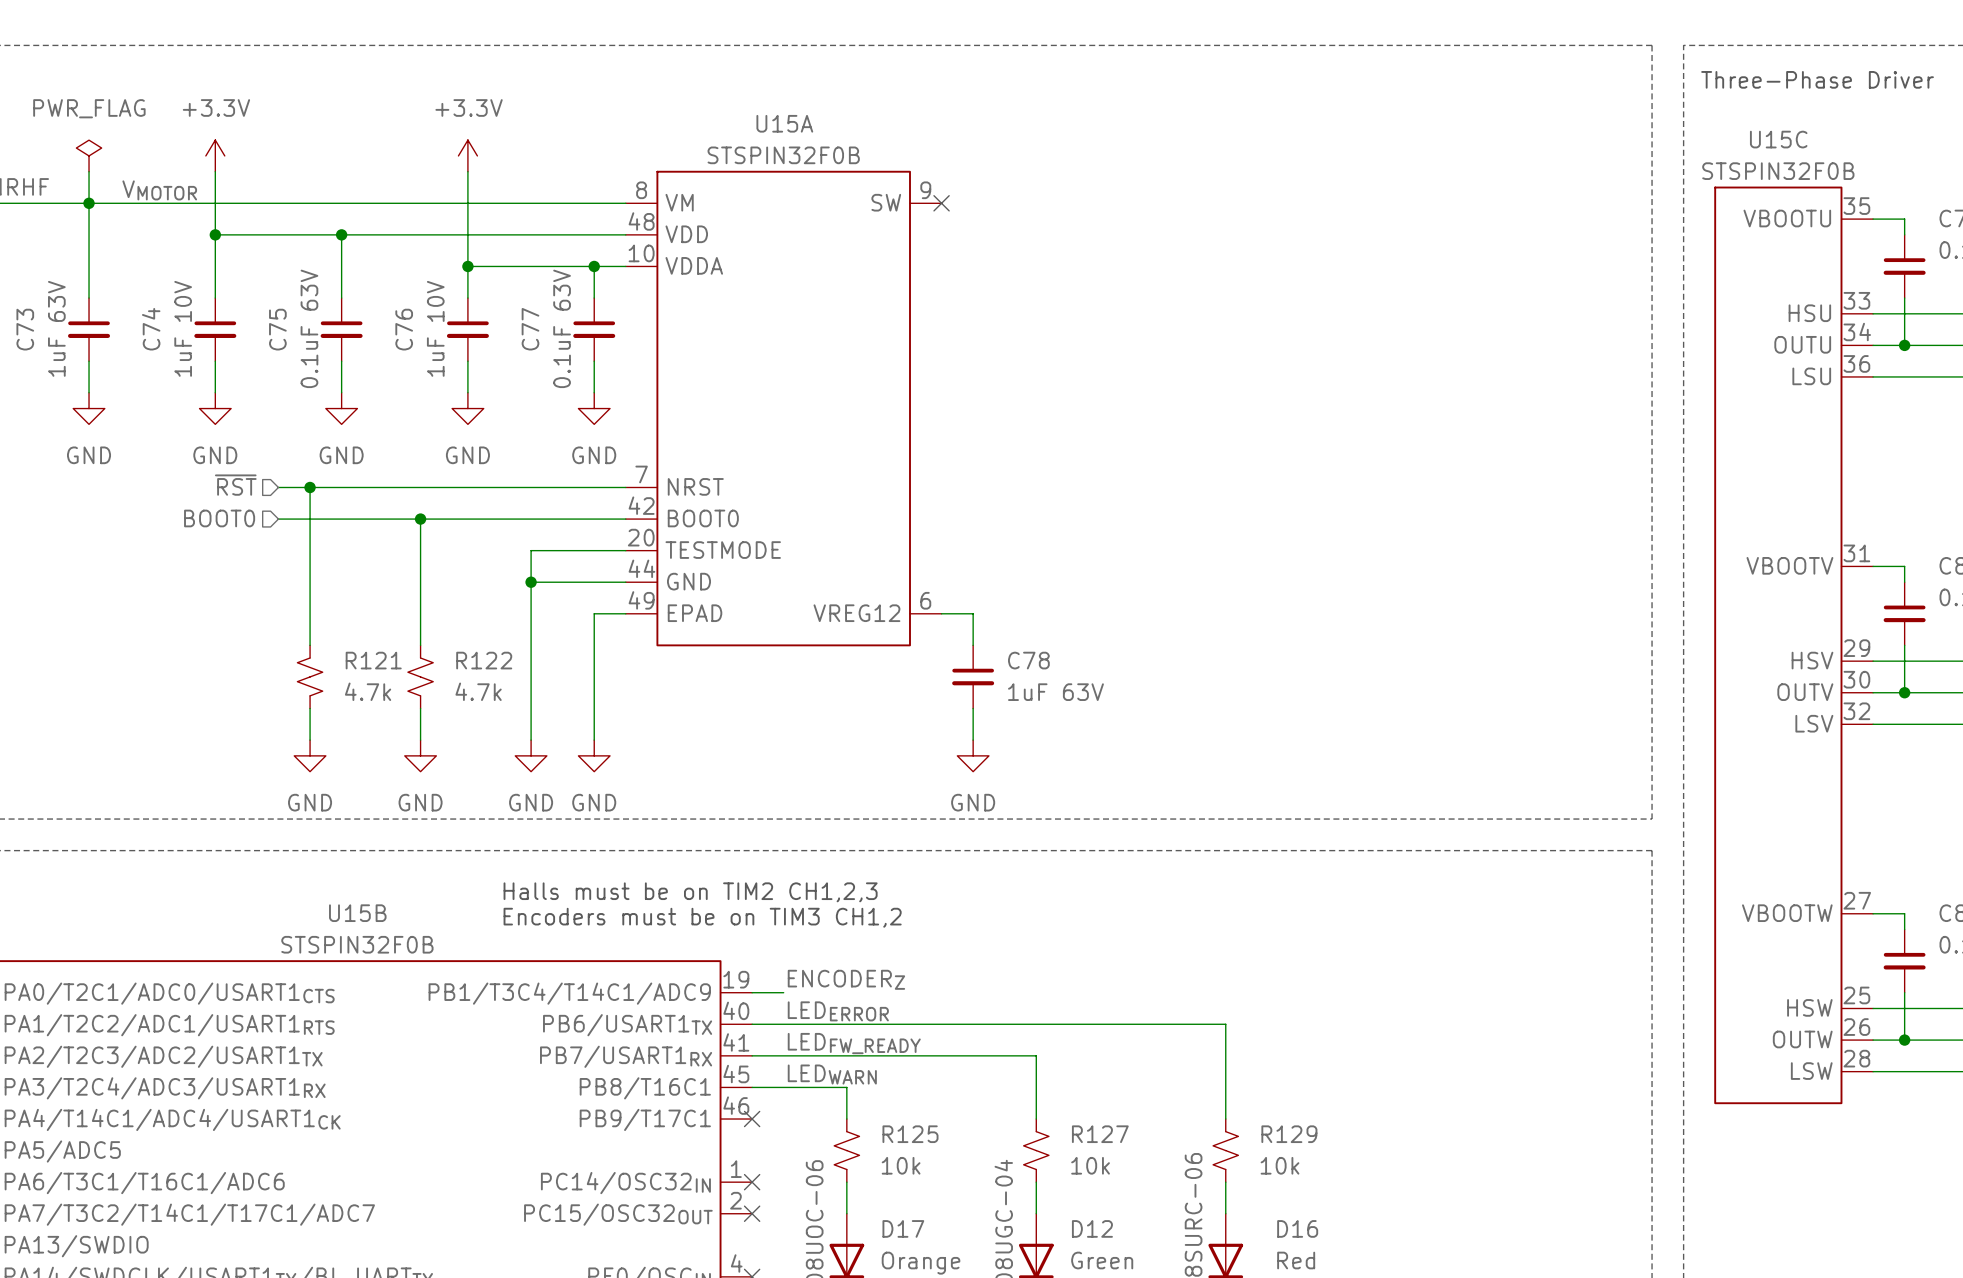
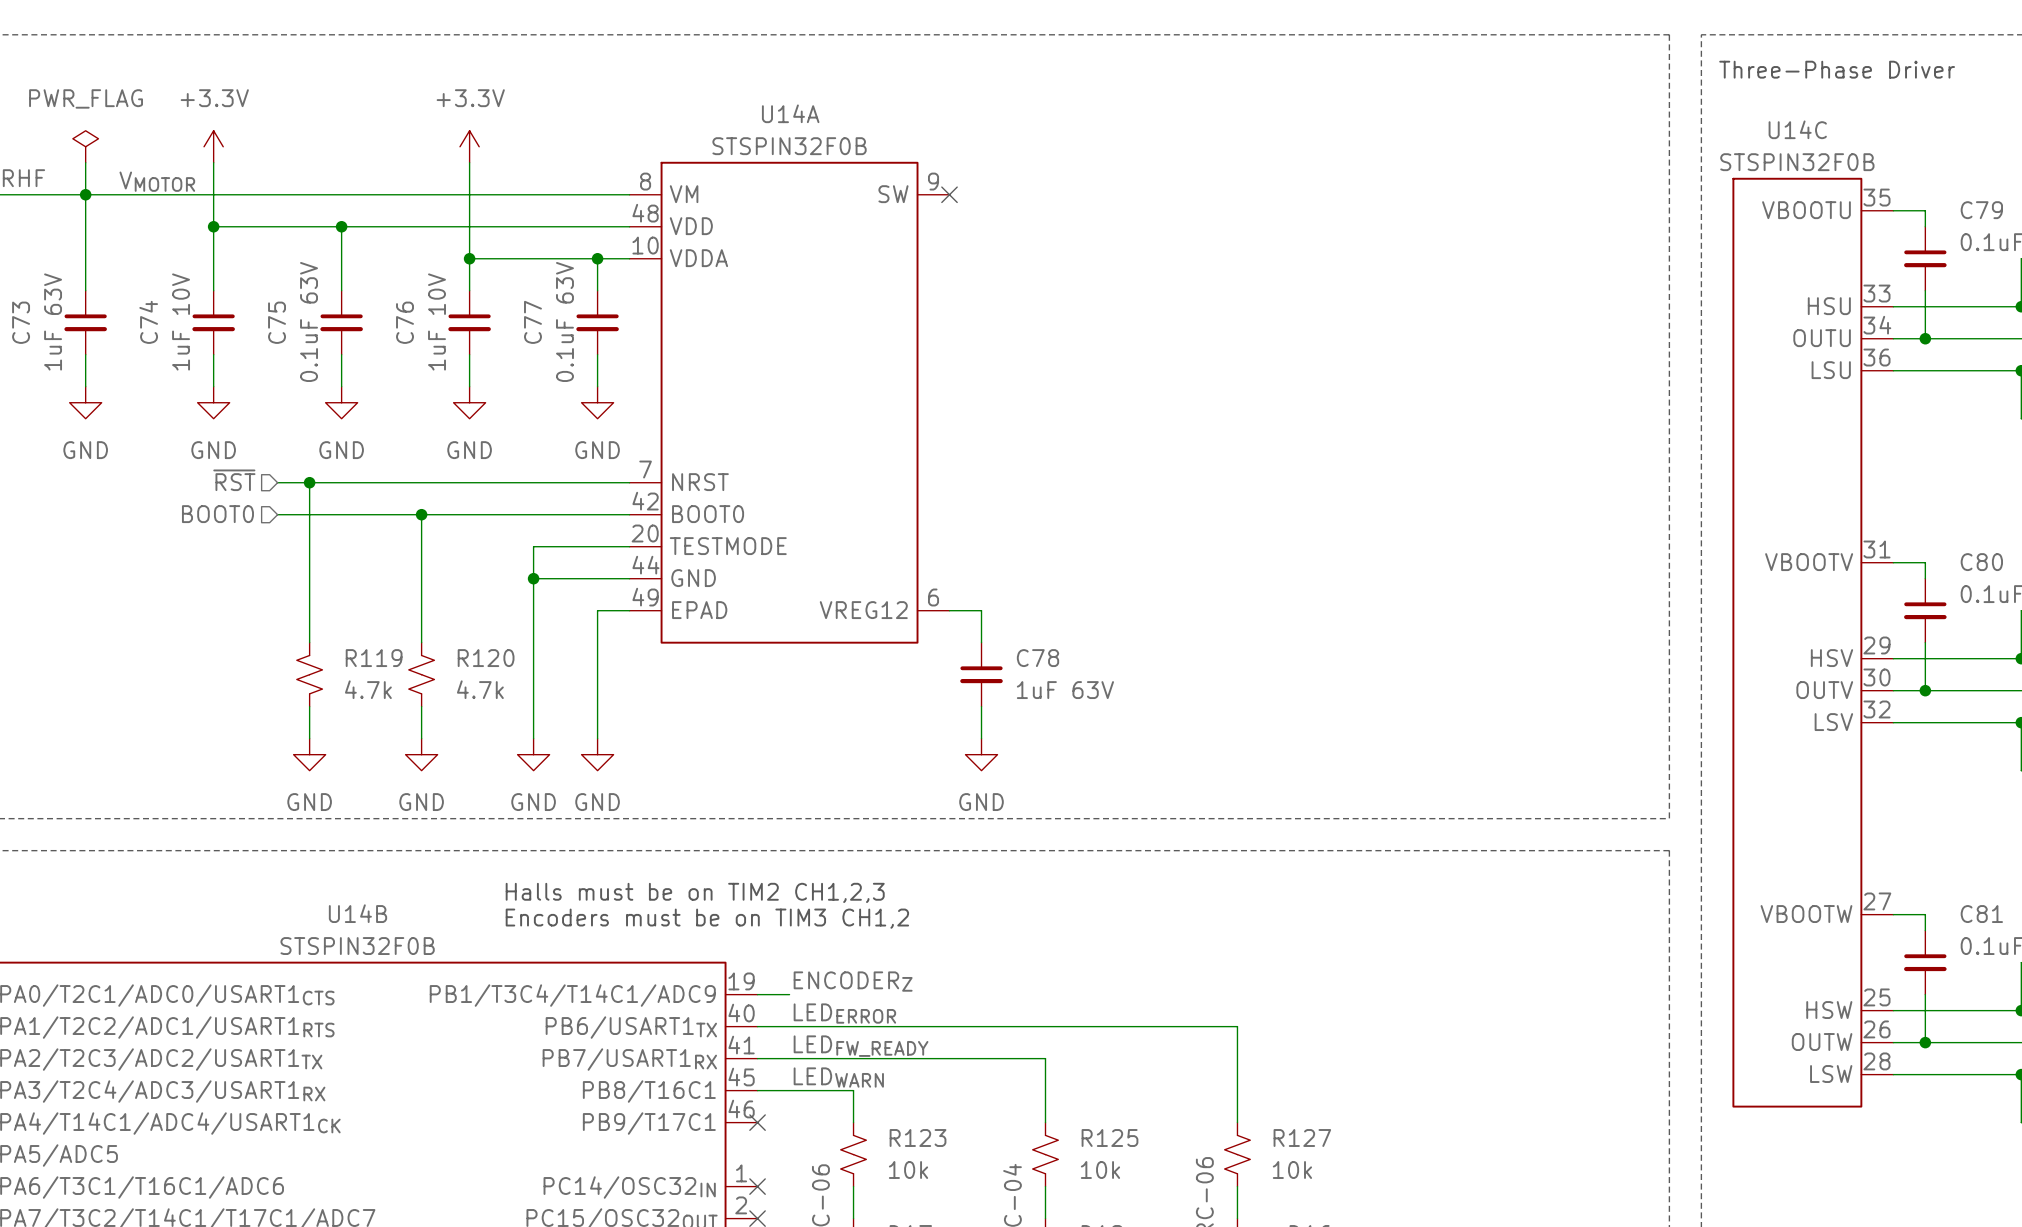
U15A name: U15A (784, 123) -> U14A (790, 113)
U15C name: U15C (1778, 139) -> U14C (1797, 129)
R121 name: R121 (373, 660) -> R119 (374, 658)
R122 name: R122 (484, 660) -> R120 (486, 658)
U15B name: U15B (357, 913) -> U14B (357, 913)
R125 name: R125 (910, 1134) -> R123 (918, 1138)
R127 name: R127 (1100, 1134) -> R125 (1109, 1138)
R129 name: R129 (1289, 1134) -> R127 (1302, 1138)

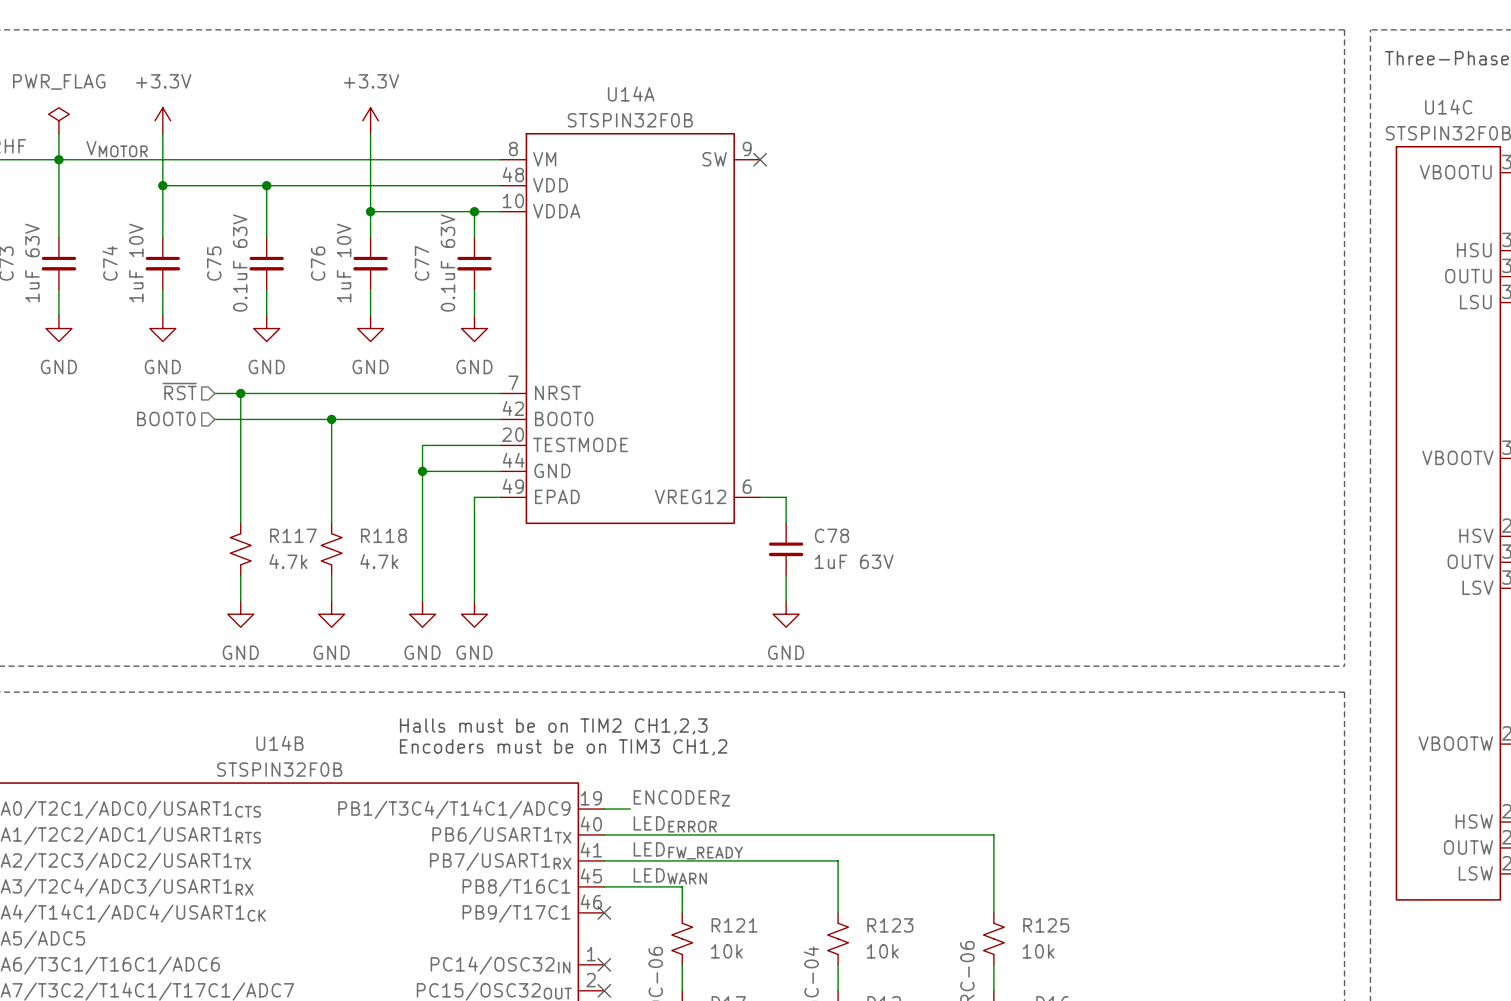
R119 name: R119 (374, 658) -> R117 (293, 535)
R120 name: R120 (486, 658) -> R118 (383, 535)
R123 name: R123 (918, 1138) -> R121 (734, 925)
R125 name: R125 (1109, 1138) -> R123 (890, 925)
R127 name: R127 (1302, 1138) -> R125 (1046, 925)

